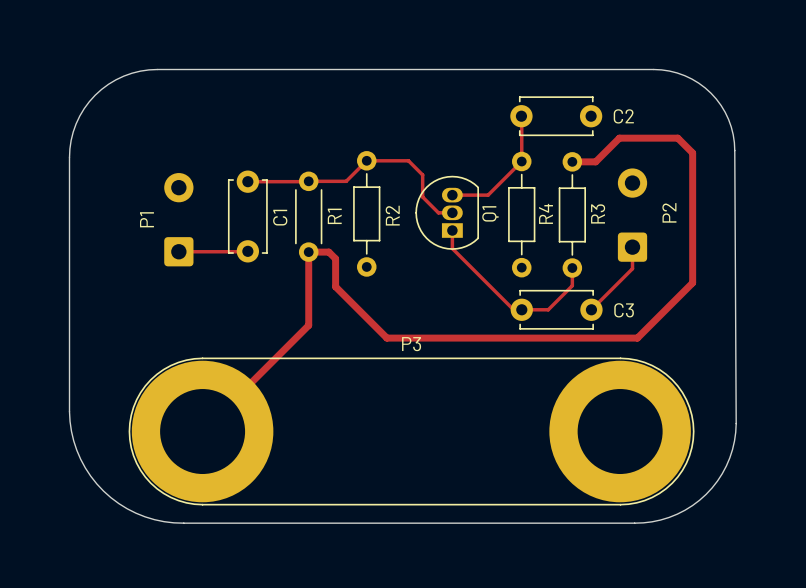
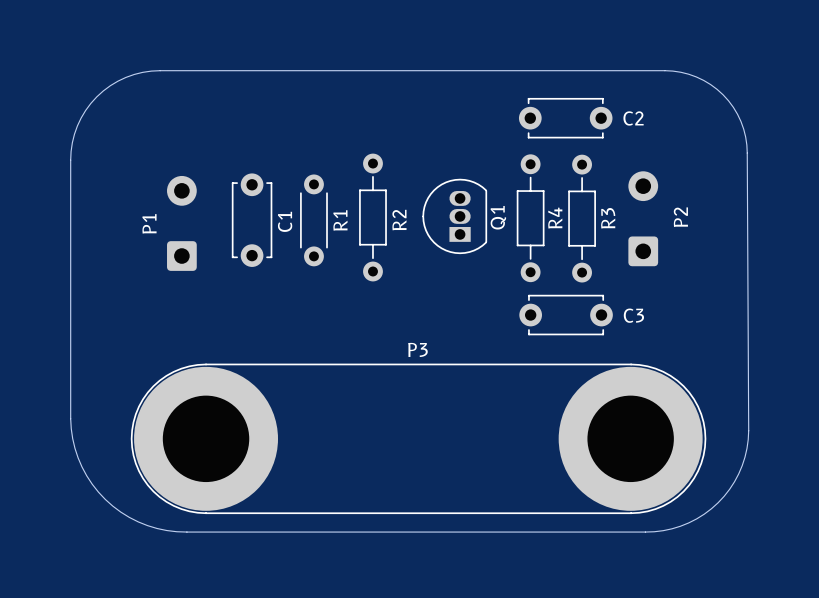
track: (521, 116) (521, 161) (488, 195) (452, 195) -> none
track: (572, 161) (595, 161) (619, 138) (677, 138) (692, 153) (692, 282) (637, 338) (386, 338) (335, 286) (335, 258) (328, 252) (308, 252) (308, 325) (202, 431) -> none
track: (247, 181) (346, 181) (366, 160) (408, 160) (422, 174) (422, 197) (438, 212) (452, 212) -> none
track: (452, 230) (452, 248) (513, 309) (548, 309) (572, 285) (572, 268) -> none
track: (632, 247) (632, 268) (591, 309) -> none
track: (247, 251) (178, 251) -> none

